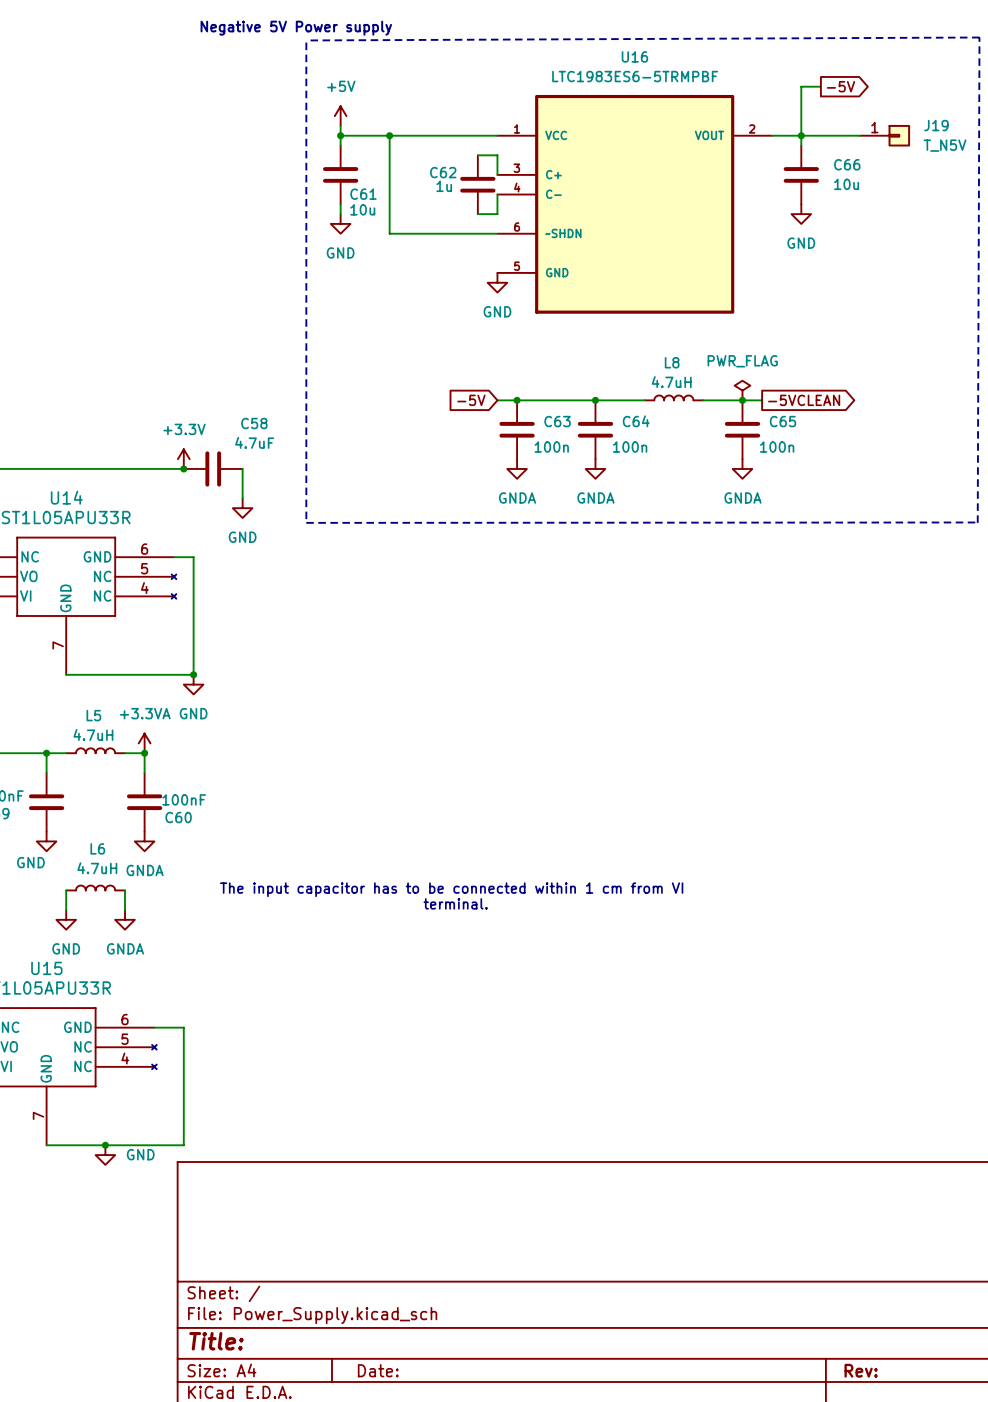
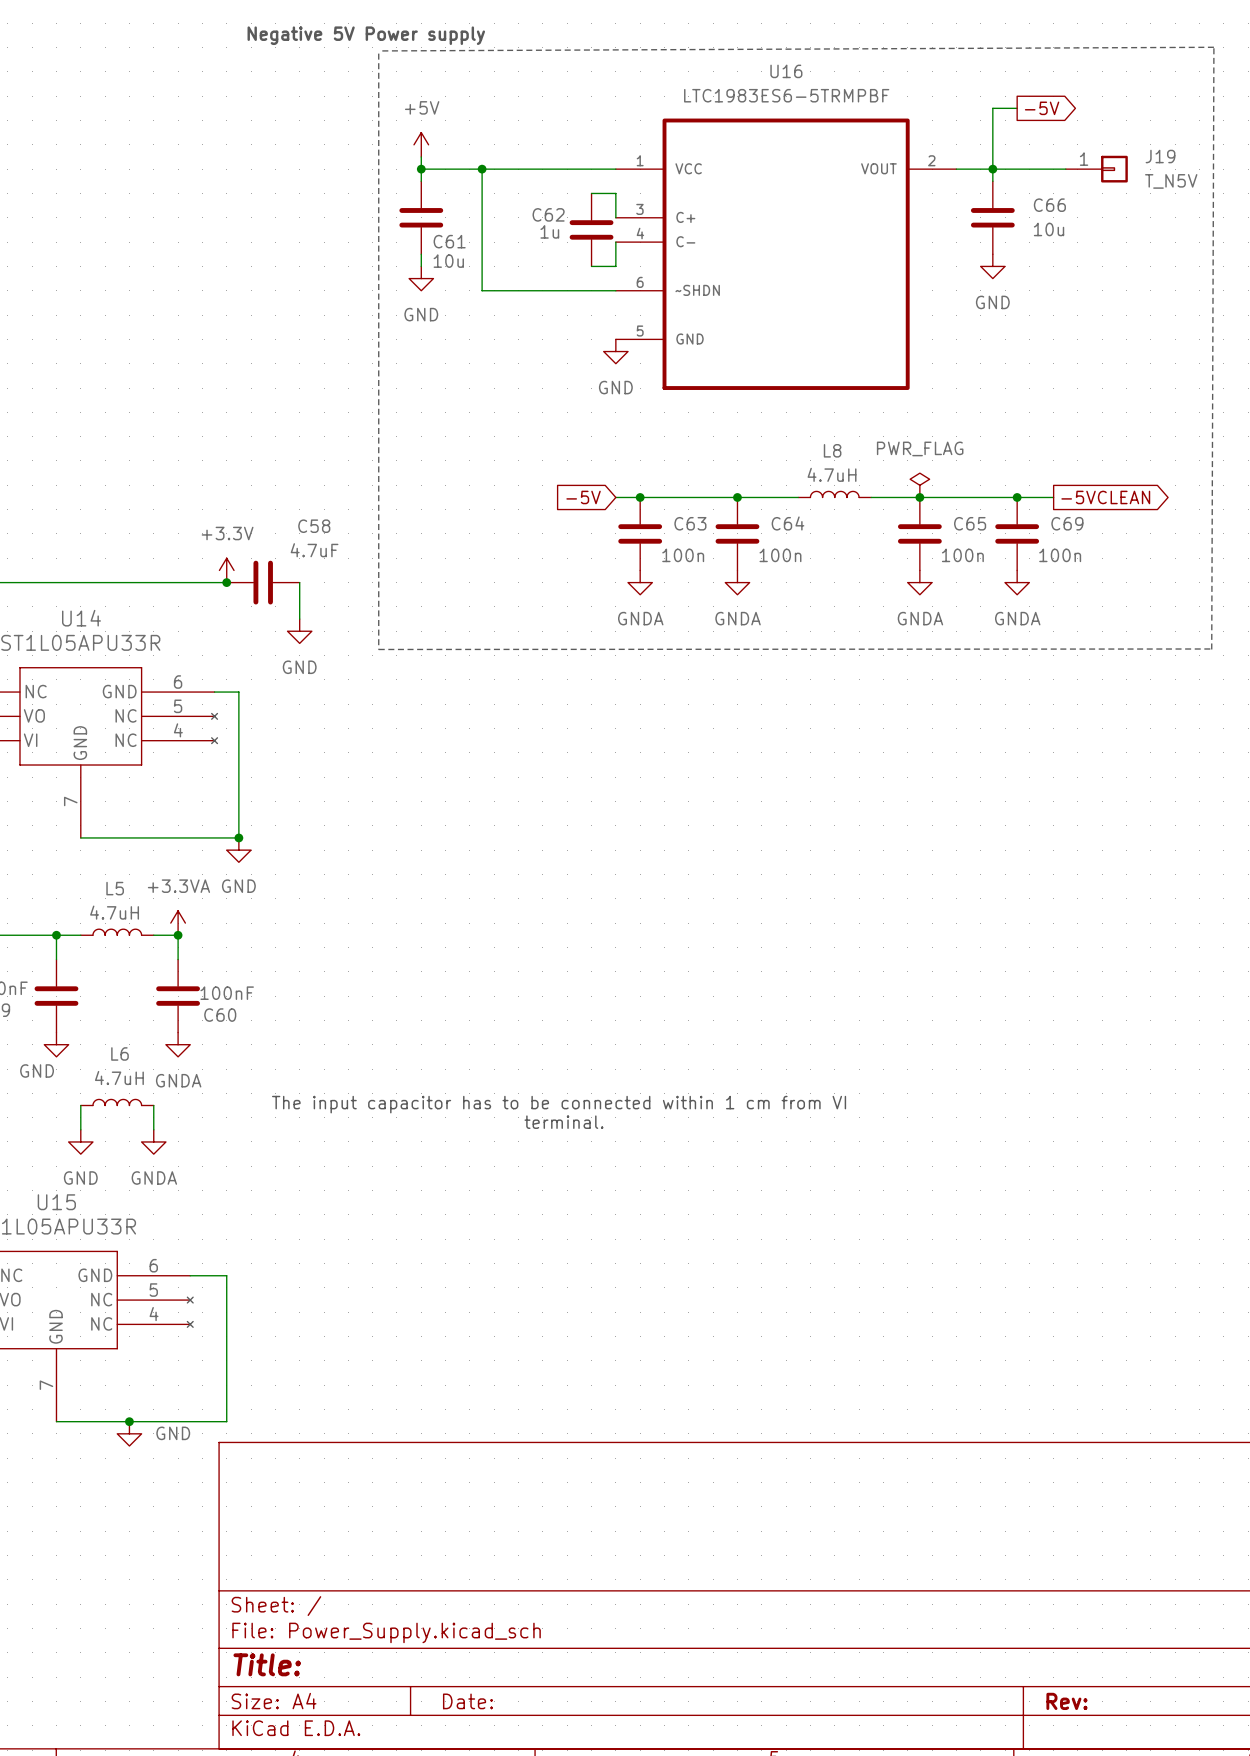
wire: none -> (944, 497) (1053, 497)
global label position: -5VCLEAN (804, 400) -> -5VCLEAN (1105, 497)
junction: none -> (1017, 497)
C69: none -> 100n (1017, 533)
power symbol: none -> GNDA (1017, 582)

